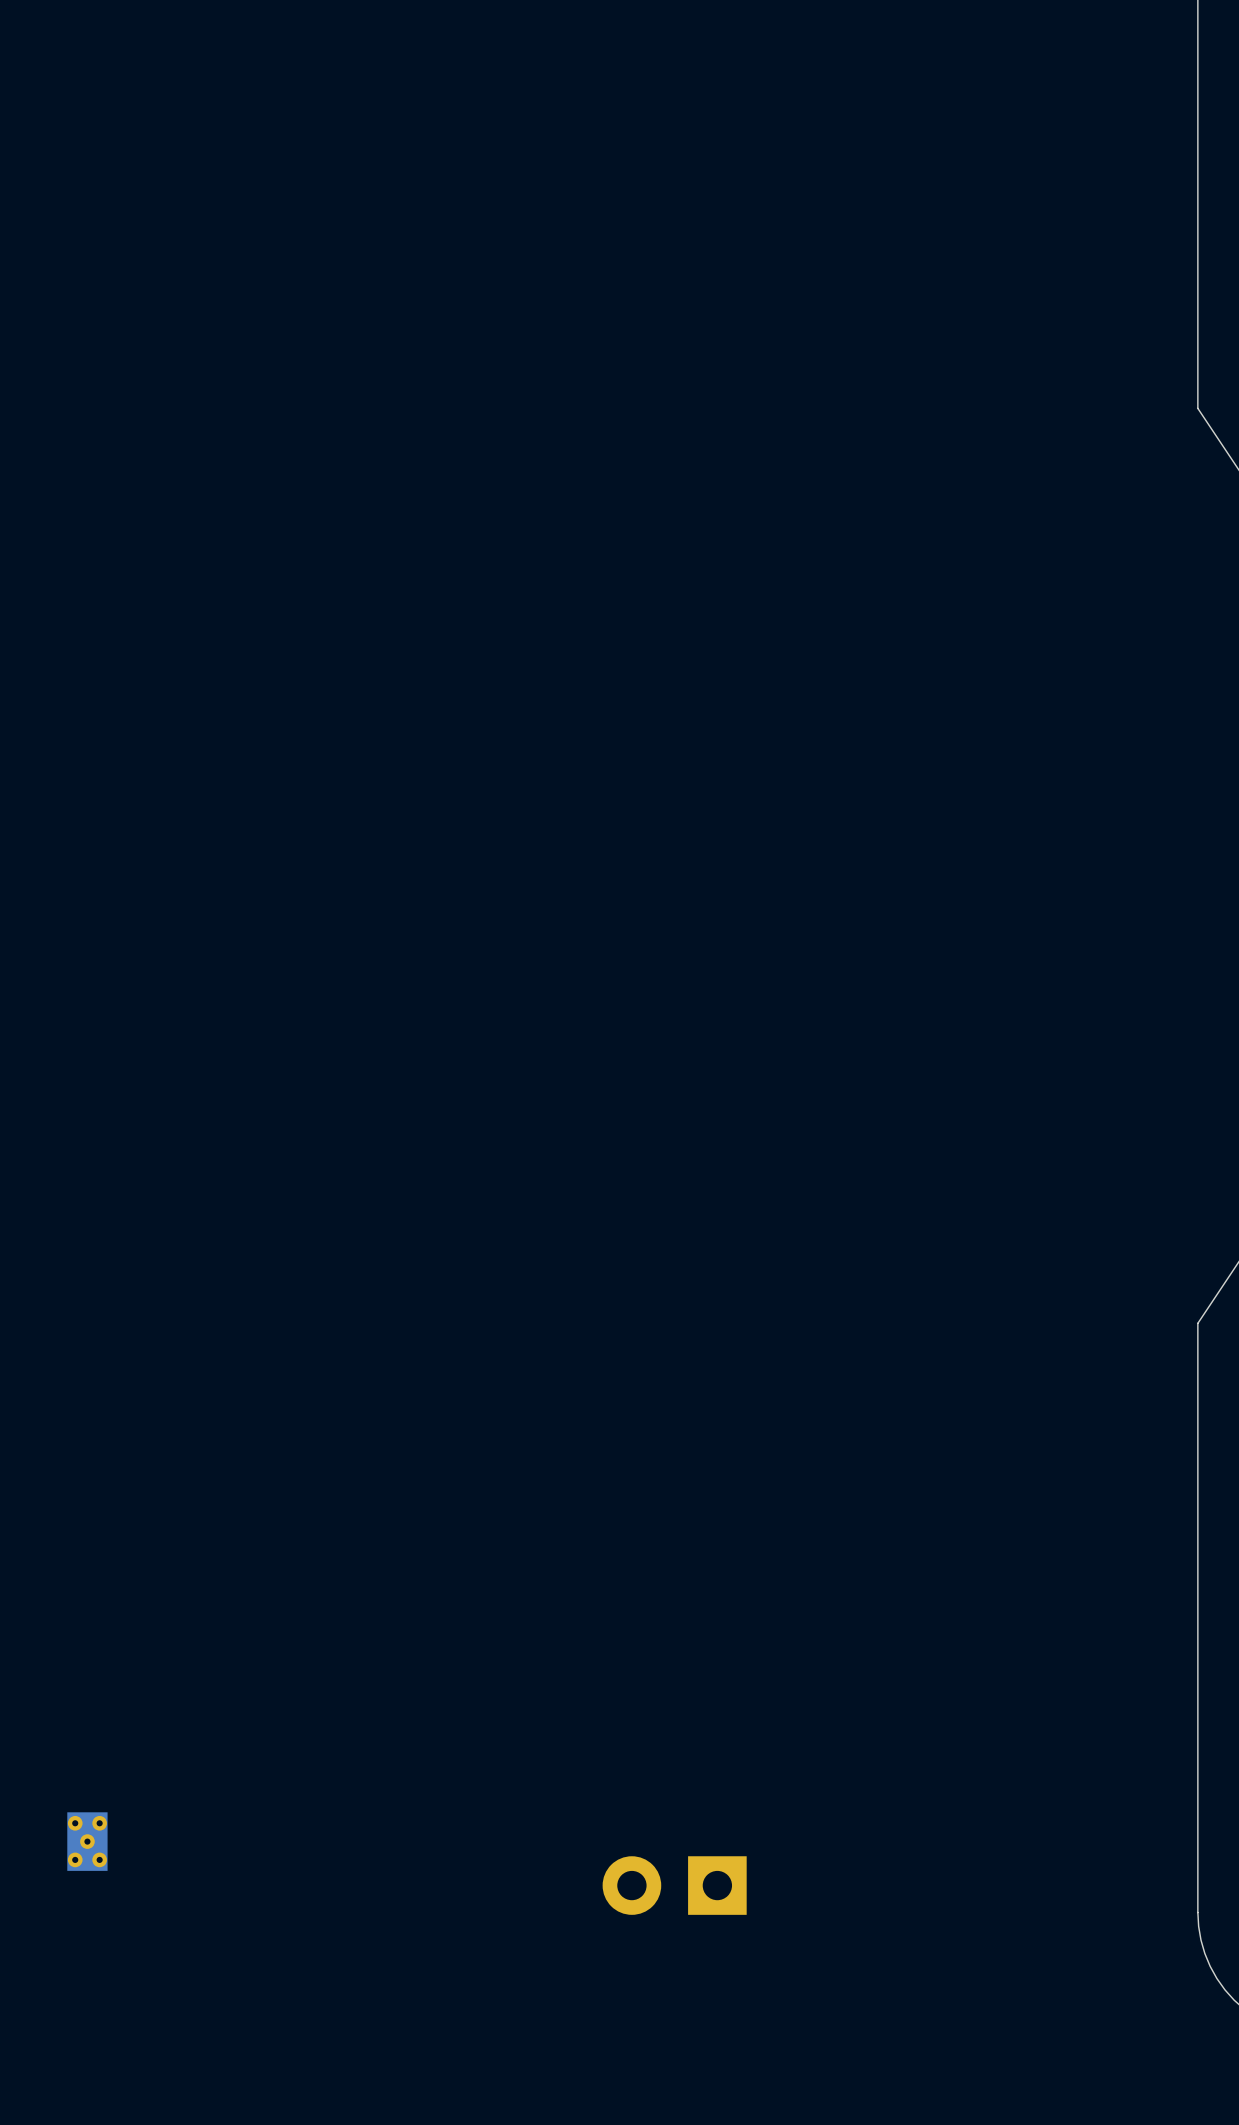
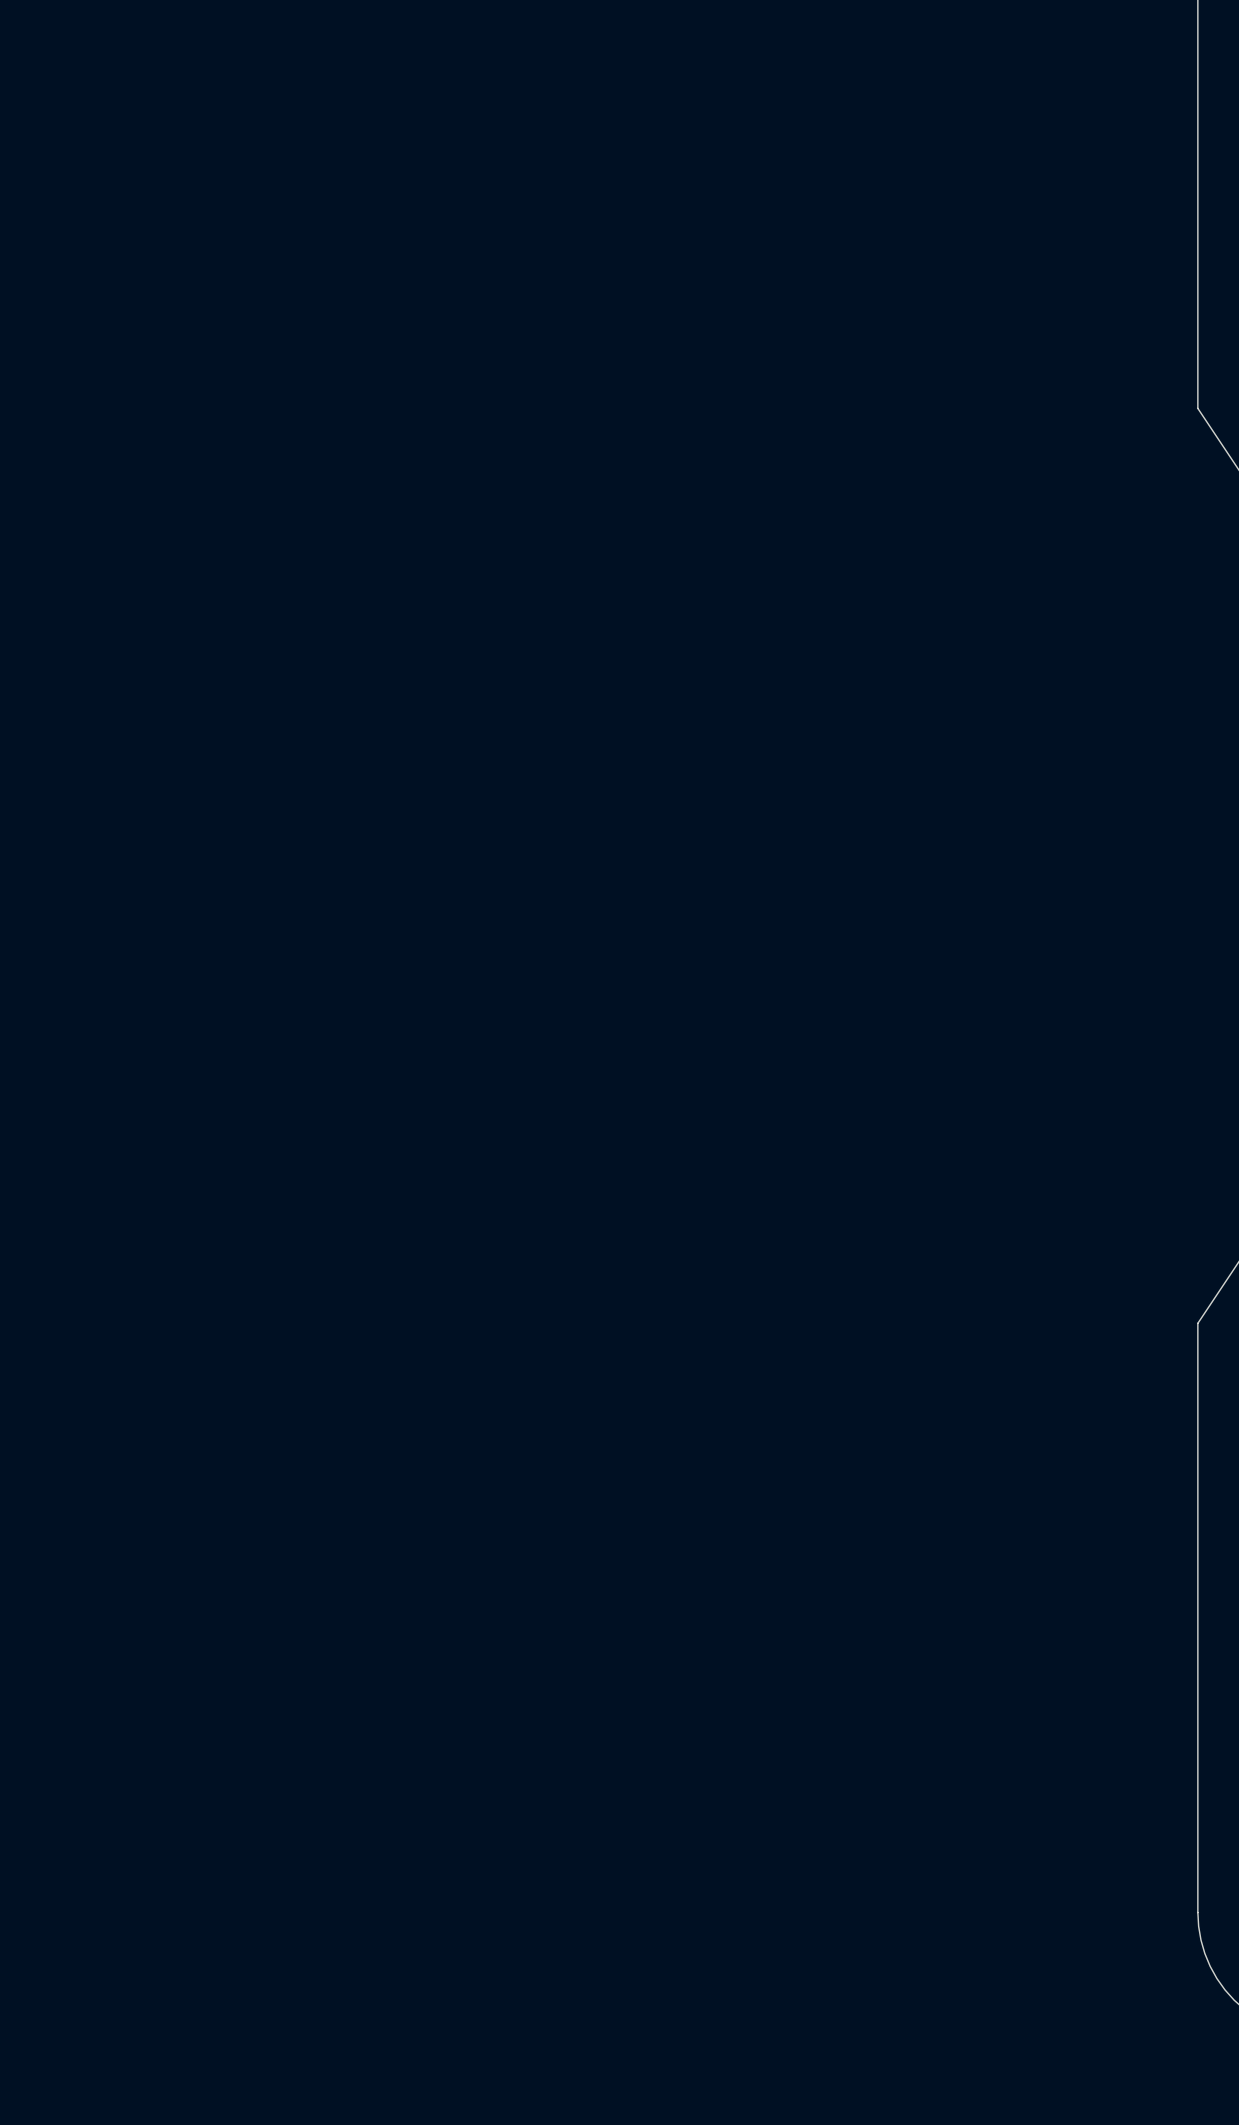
part: (87, 1841) -> none
part: (674, 1885) -> none

